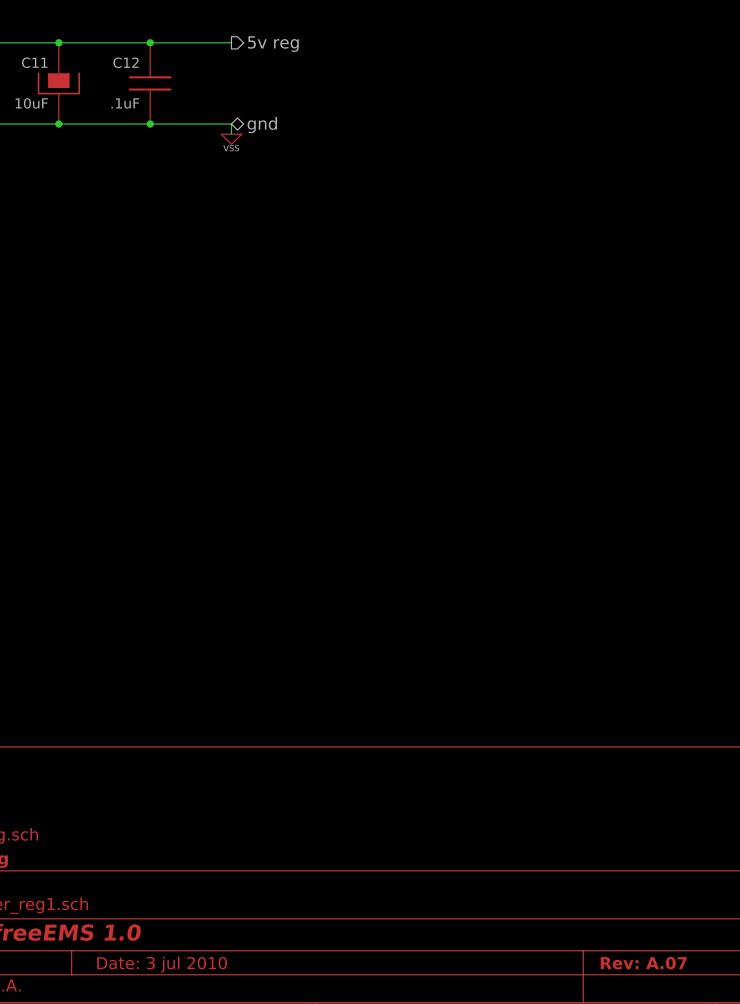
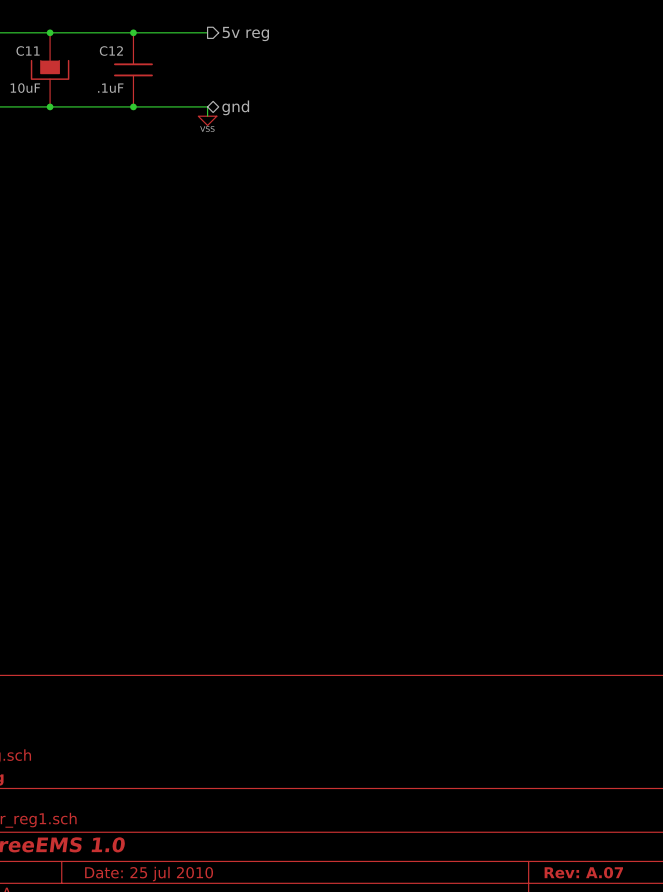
title block: Date: 3 jul 2010 (162, 964) -> Date: 25 jul 2010 (149, 874)

